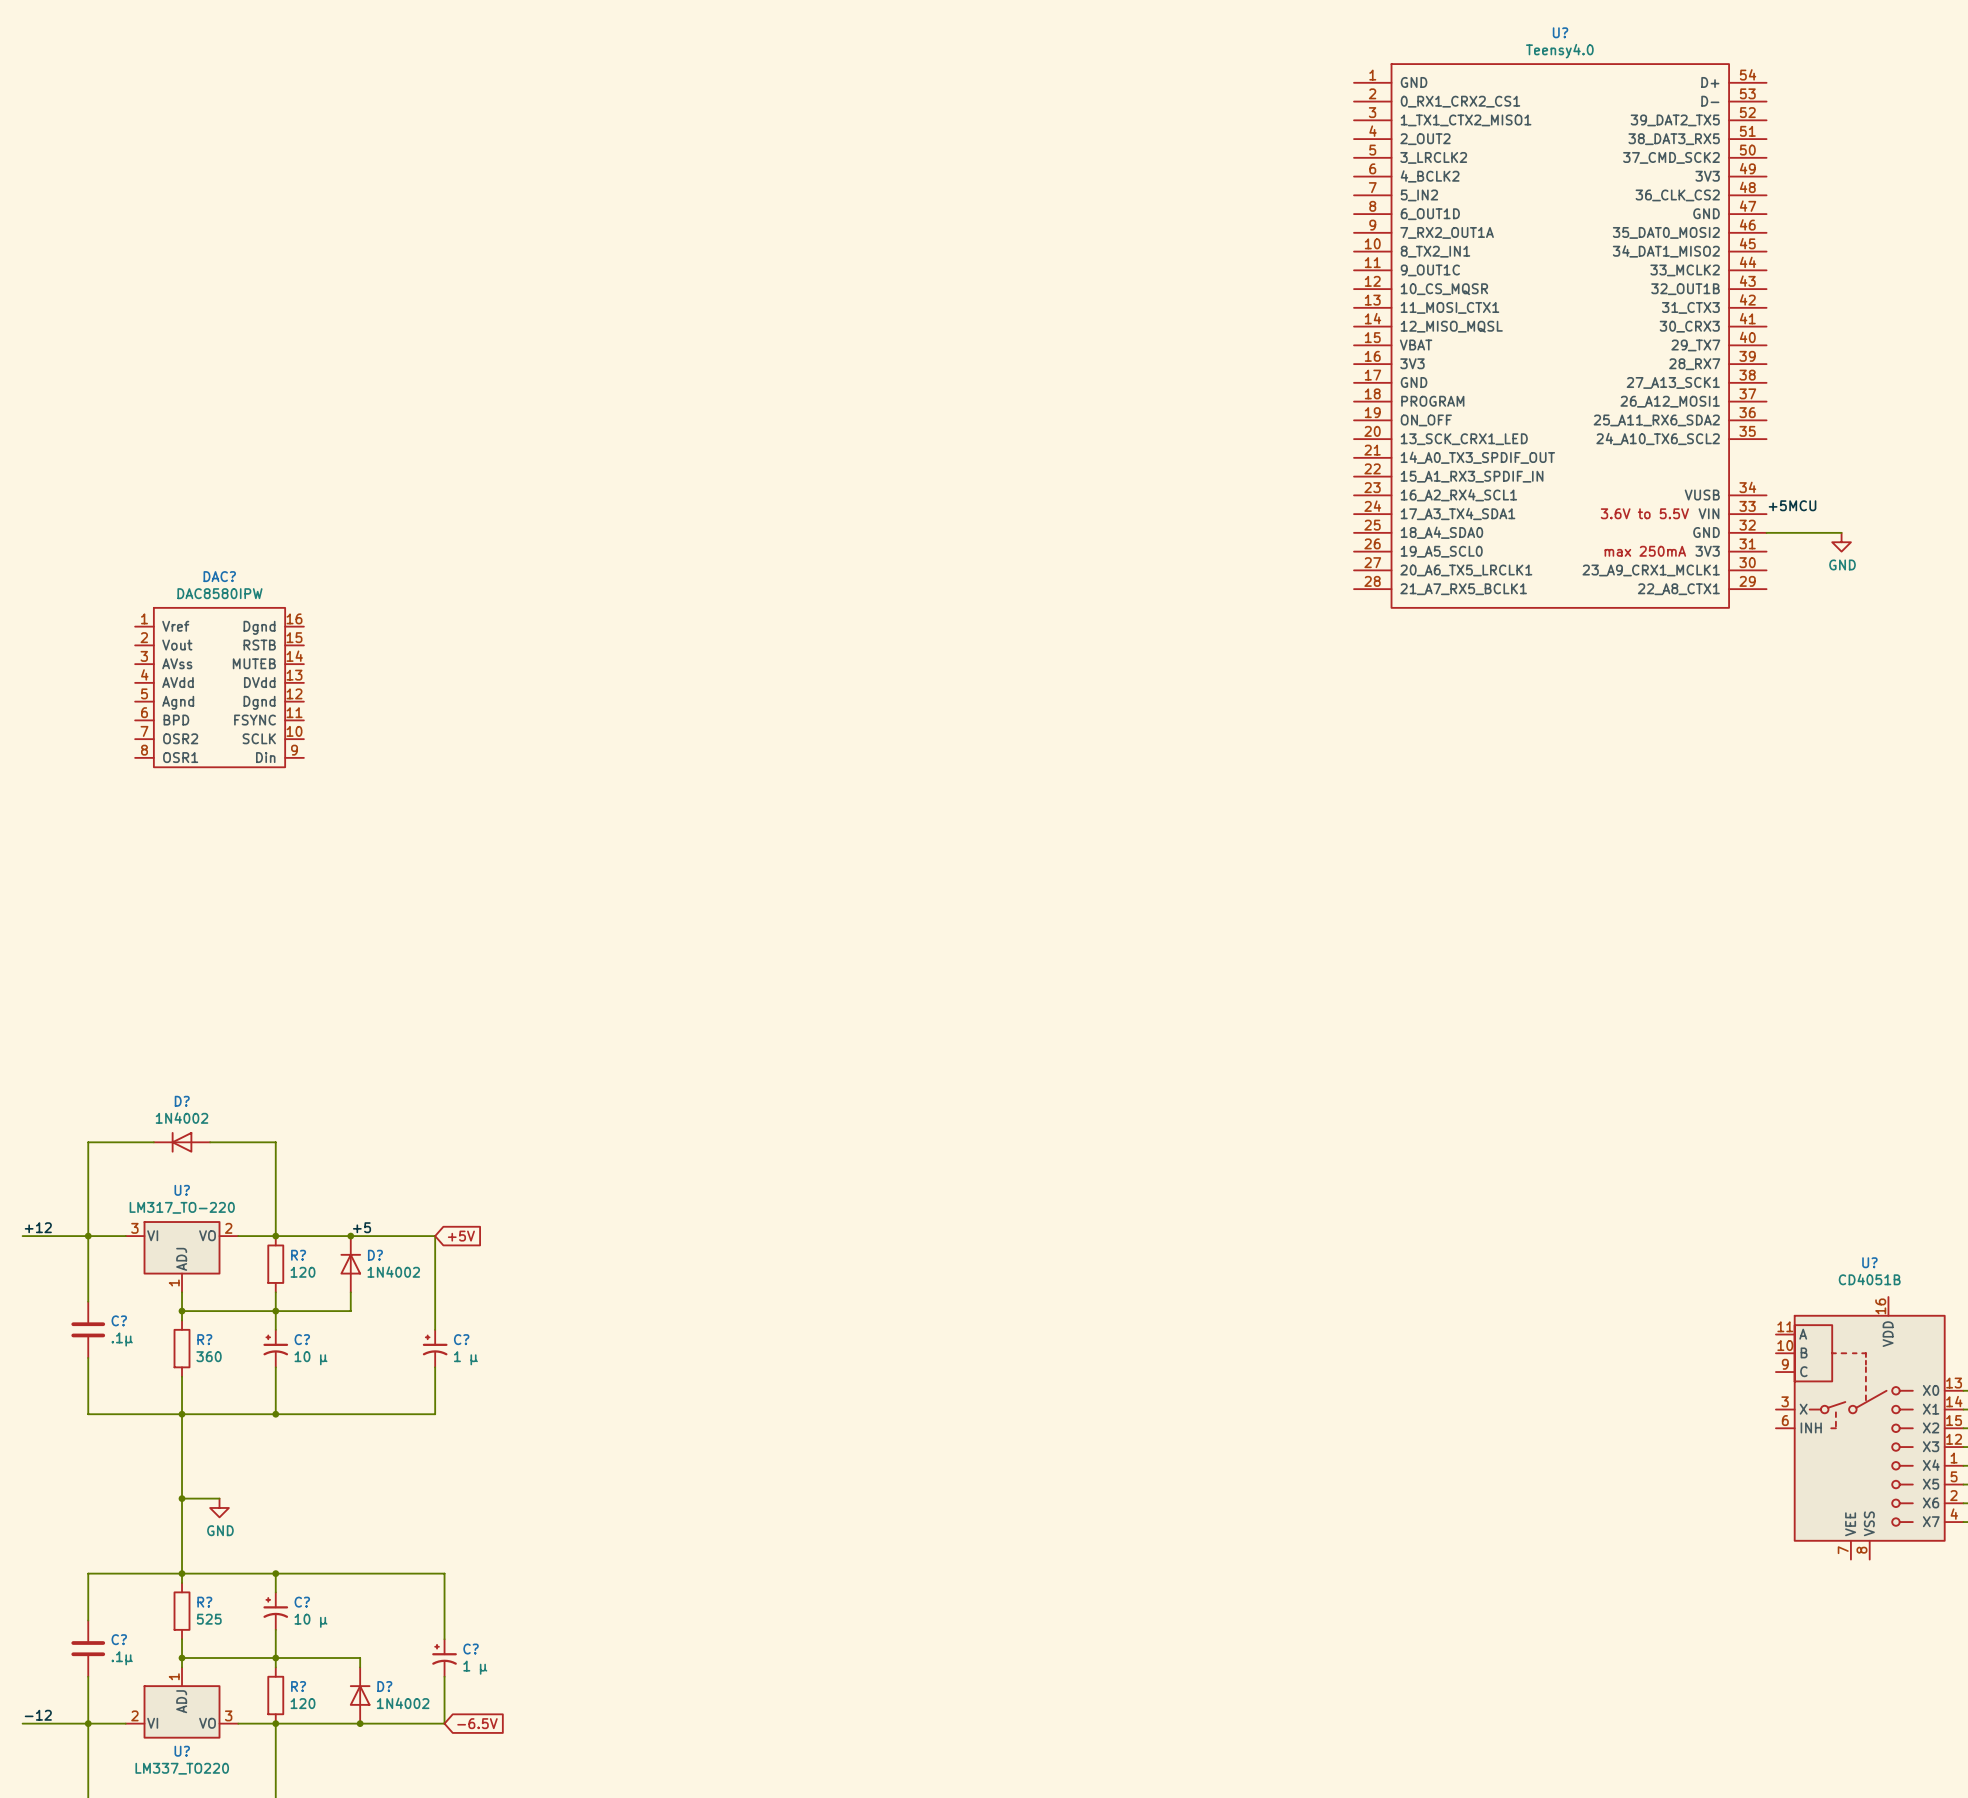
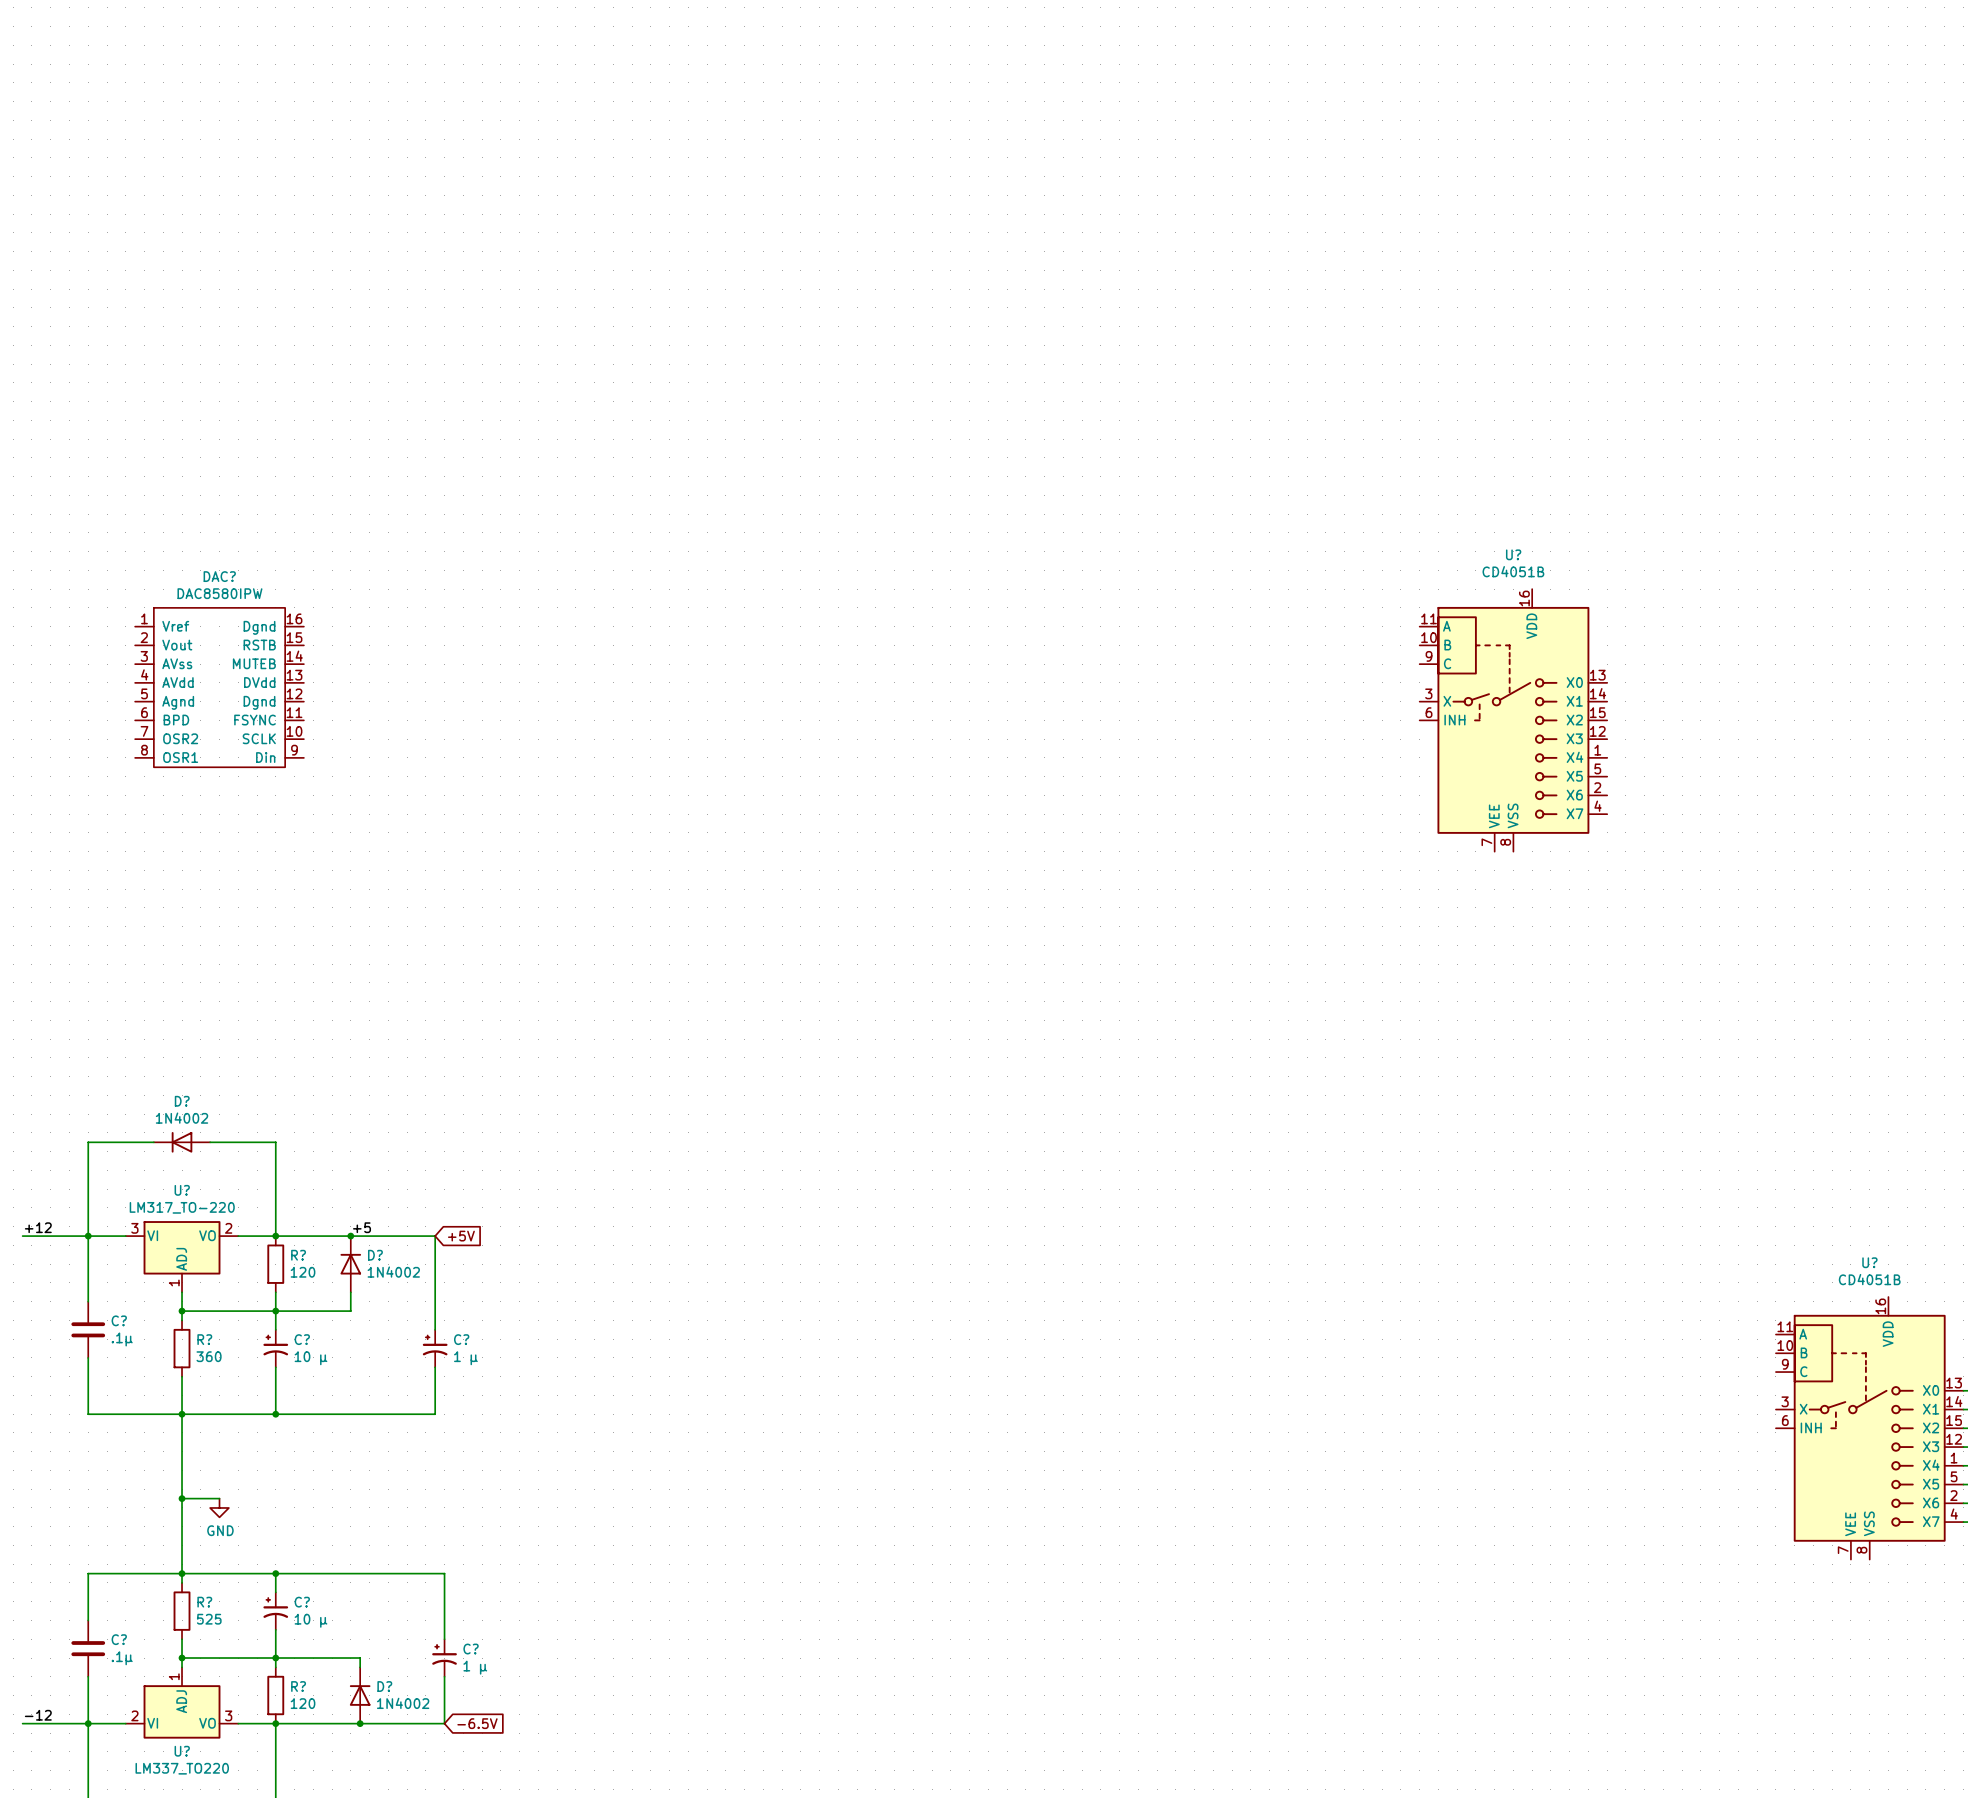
U?: Teensy4.0 (1560, 335) -> none
label: +5MCU (1792, 505) -> none
wire: (1766, 532) (1841, 532) -> none
power symbol: GND (1841, 542) -> none
U?: none -> CD4051B (1513, 720)

